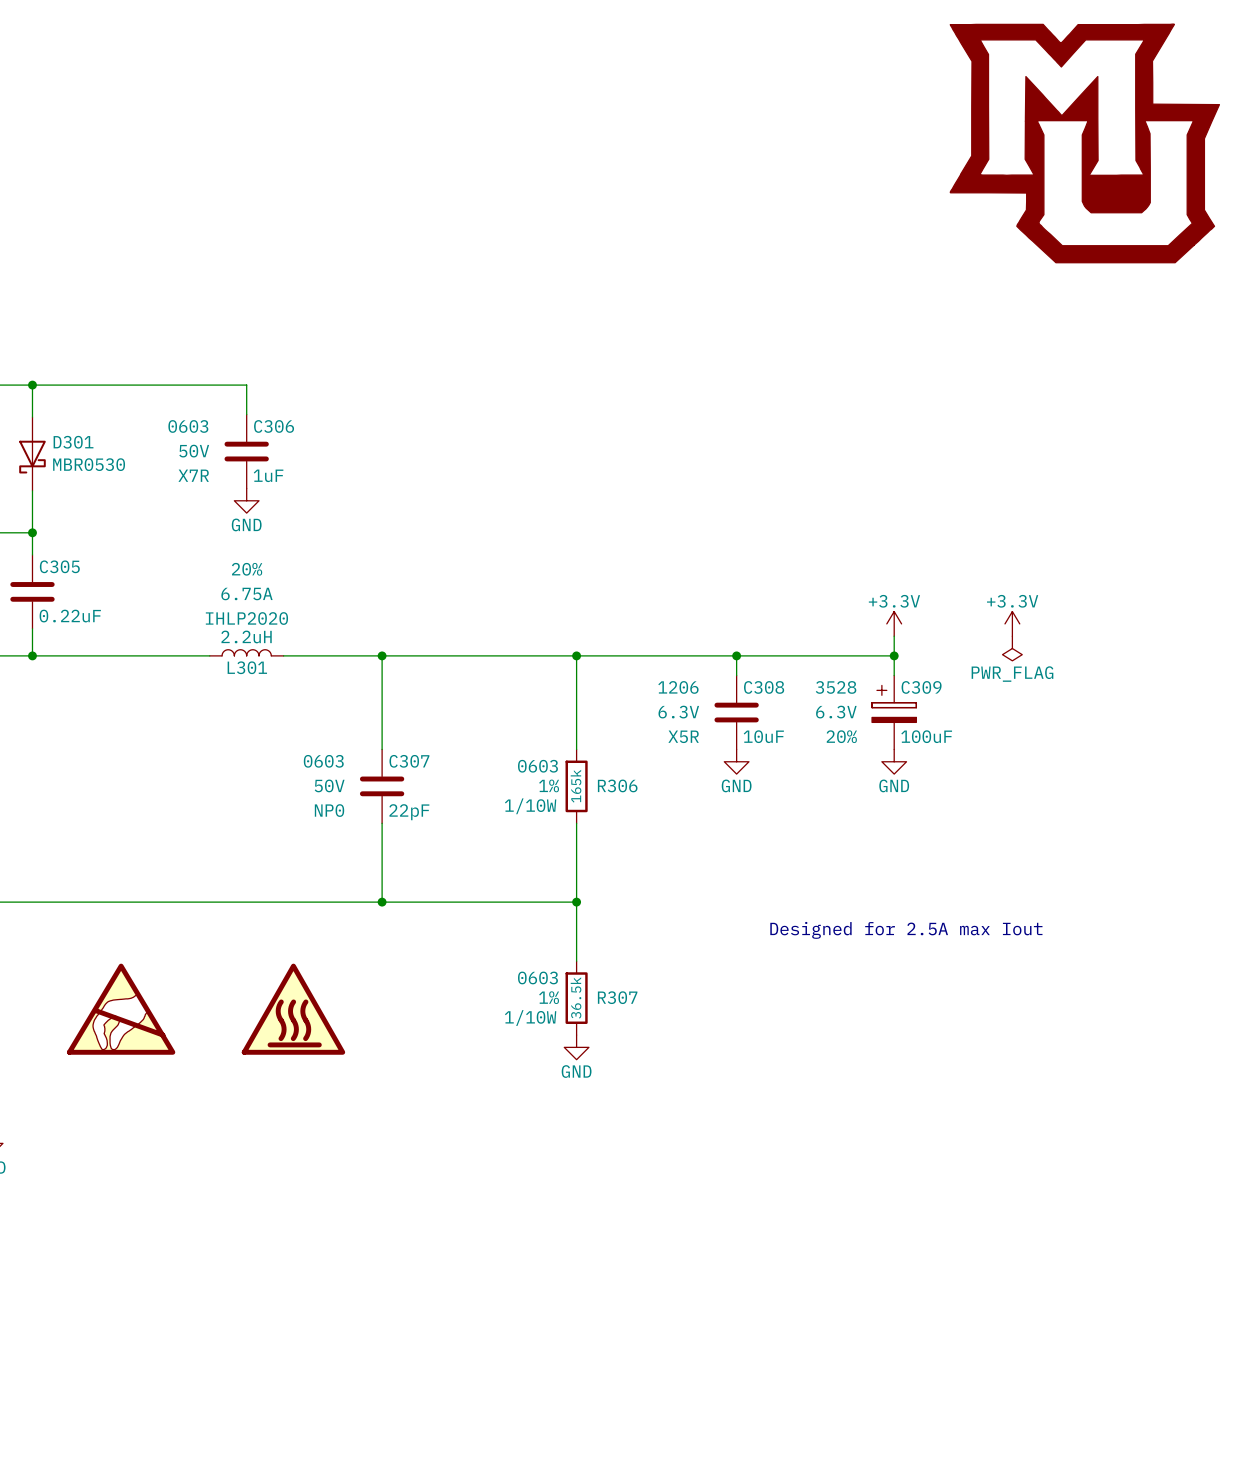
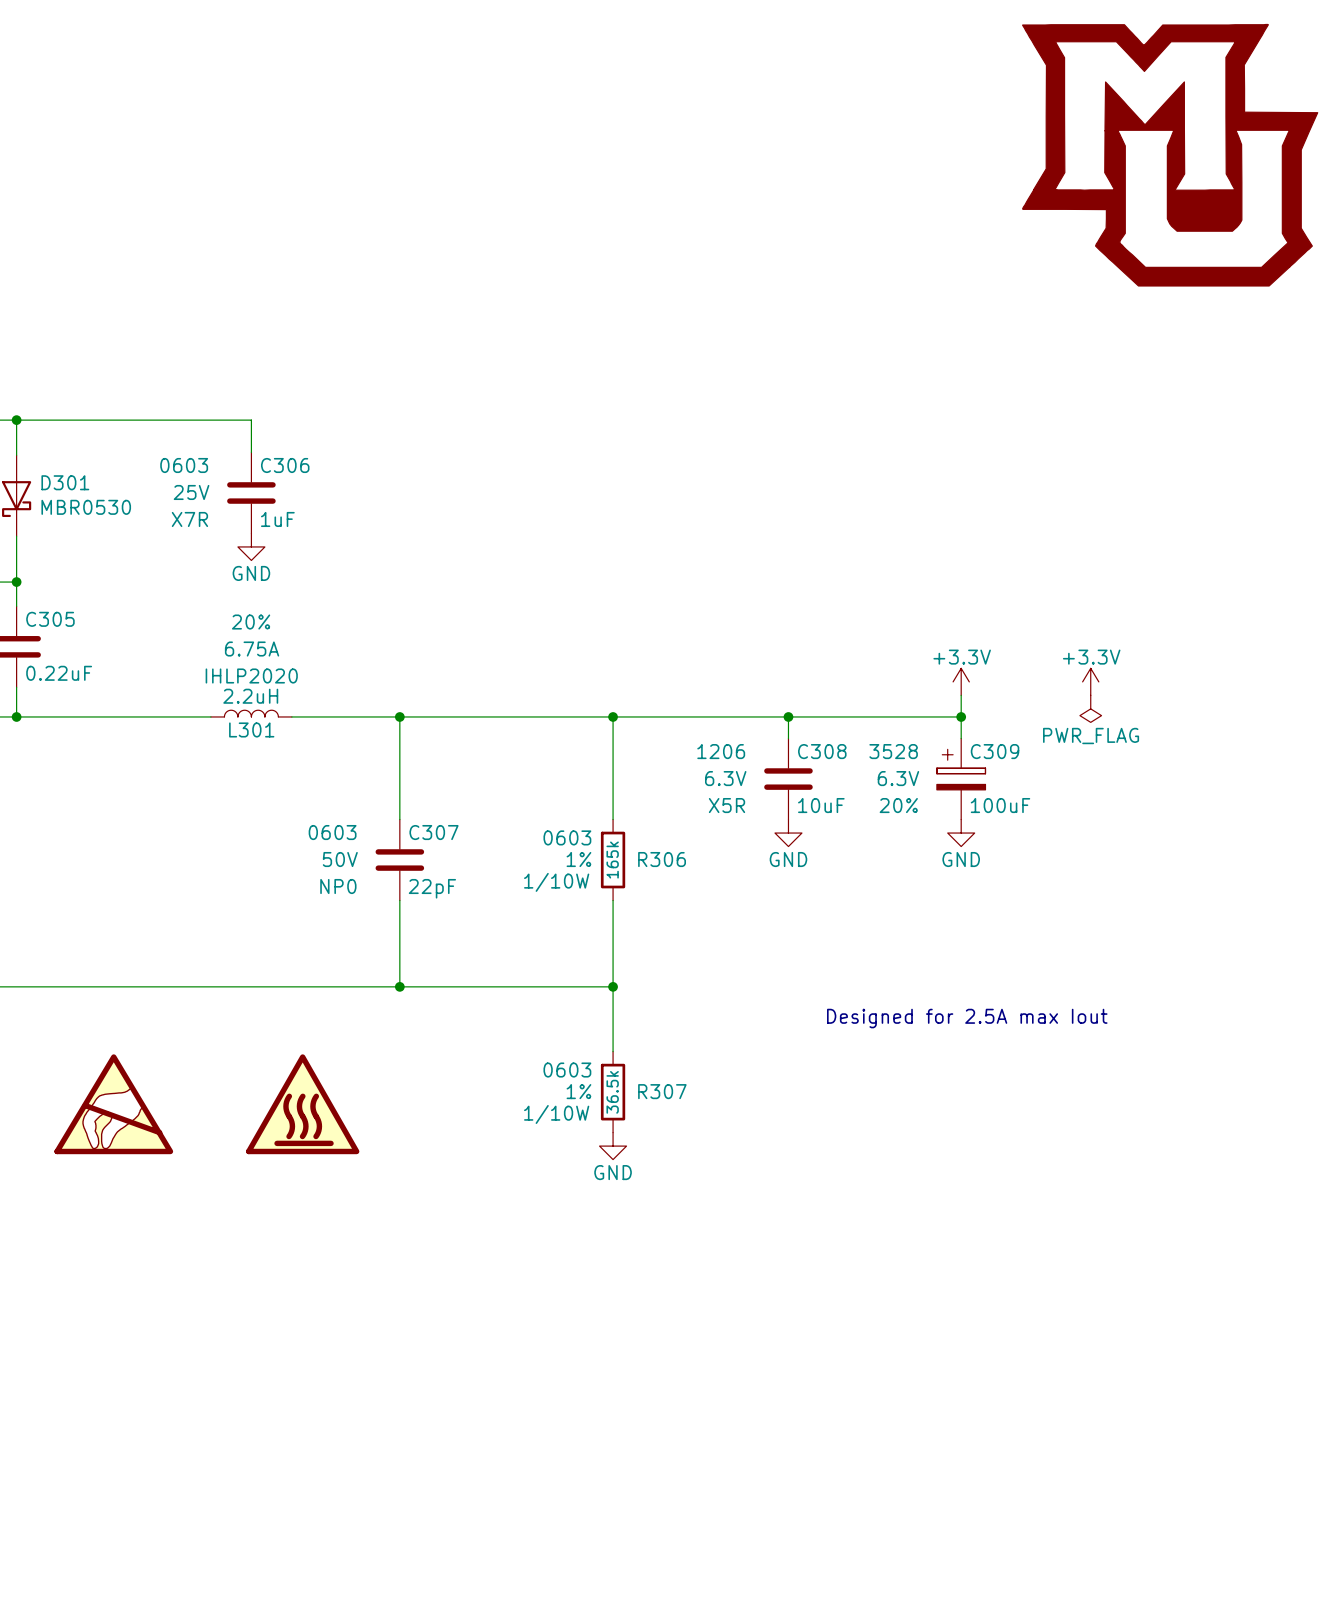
C306 text: 50V (194, 451) -> 25V (191, 492)

